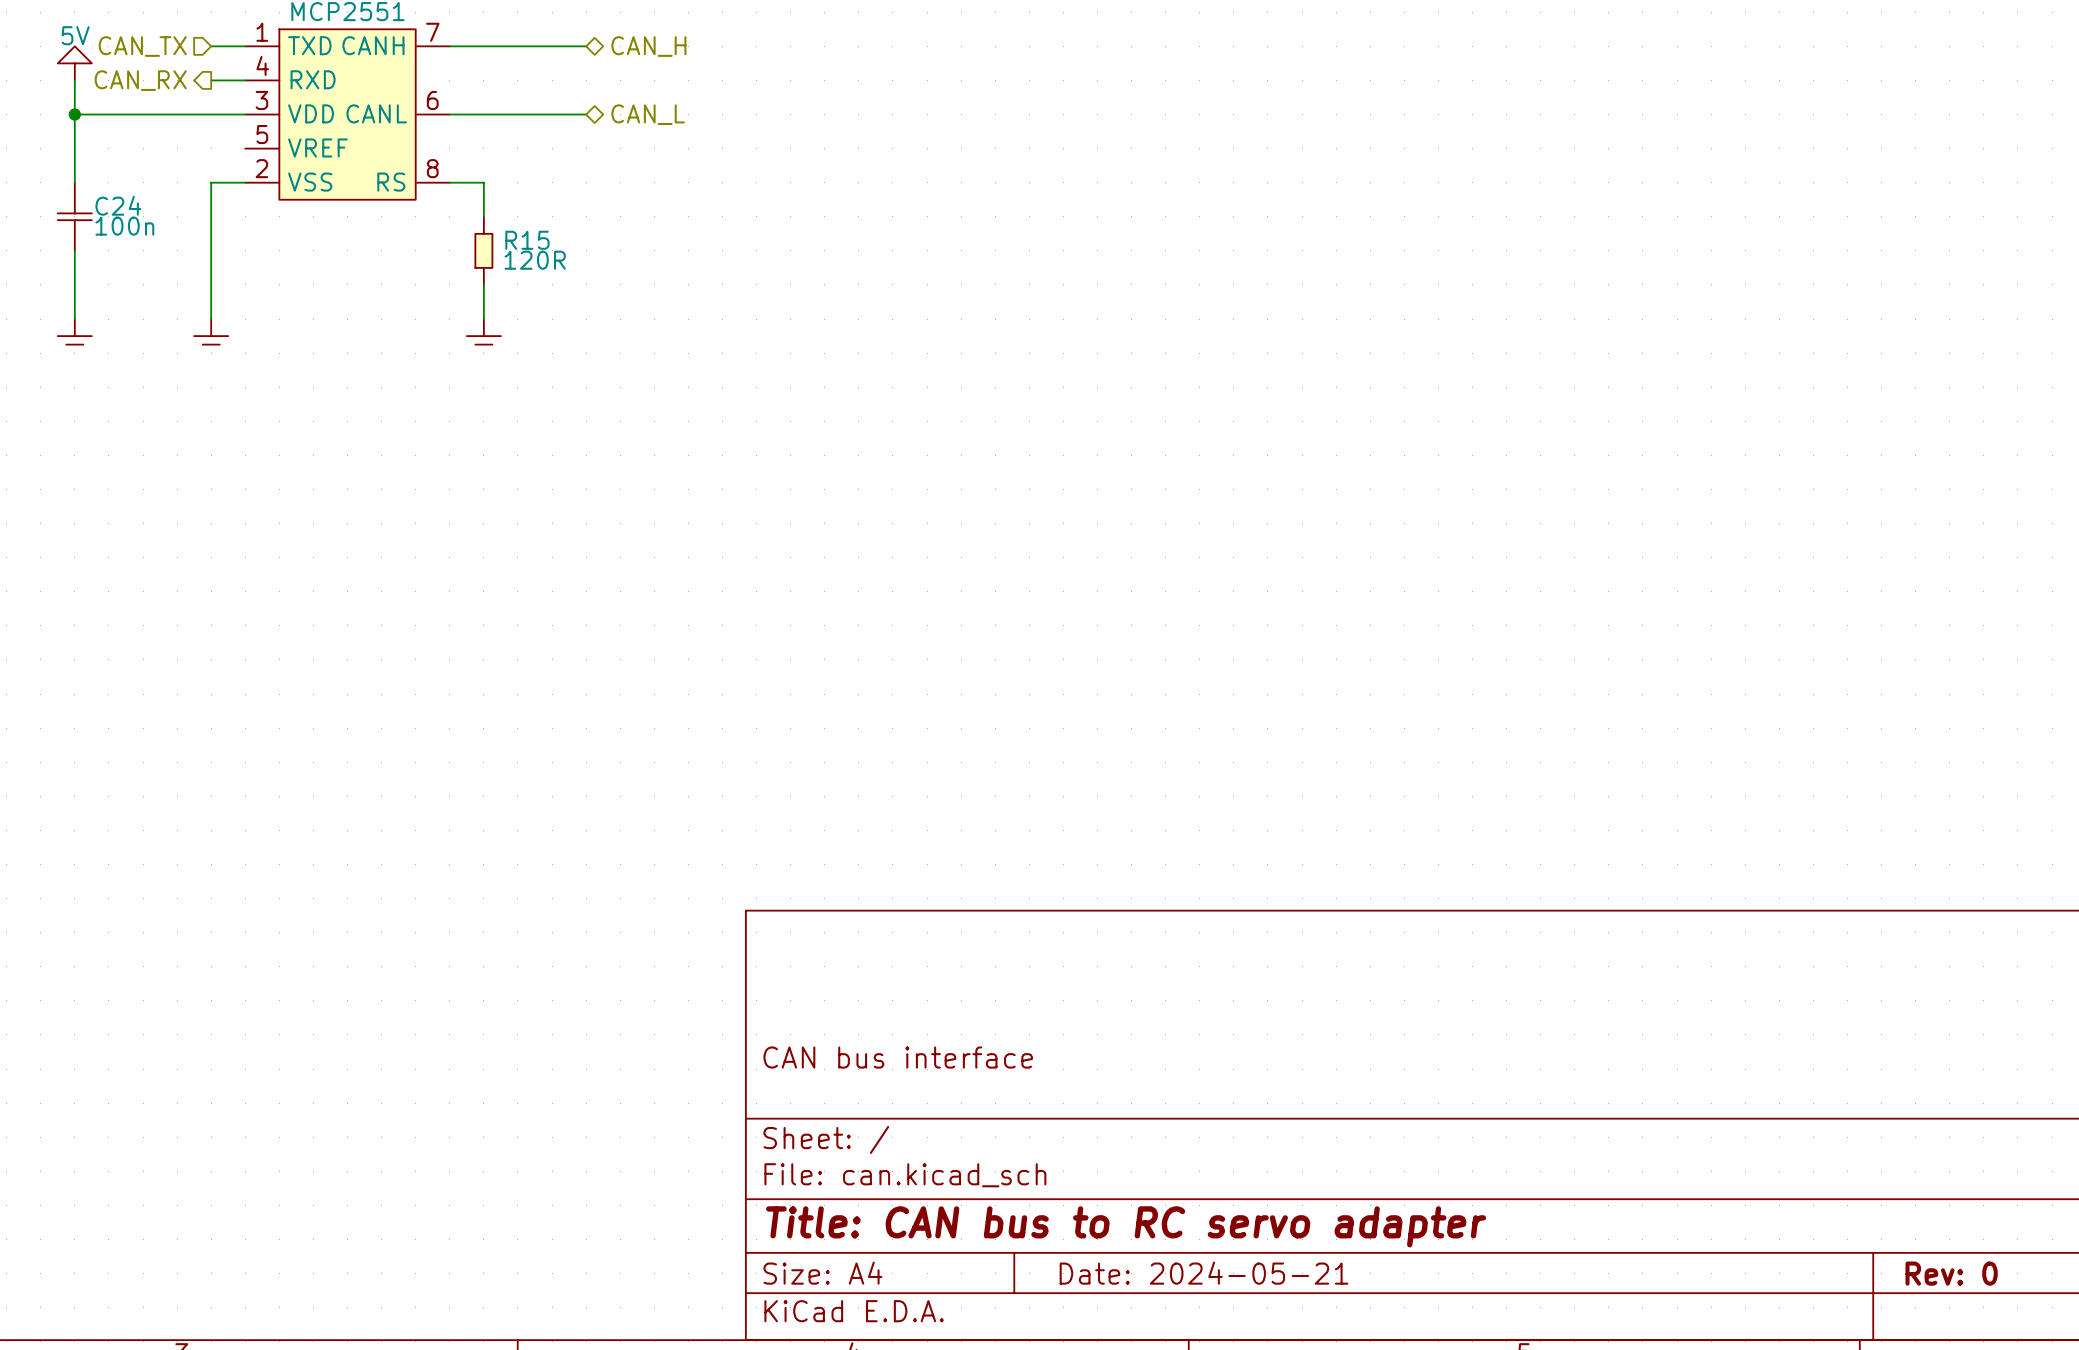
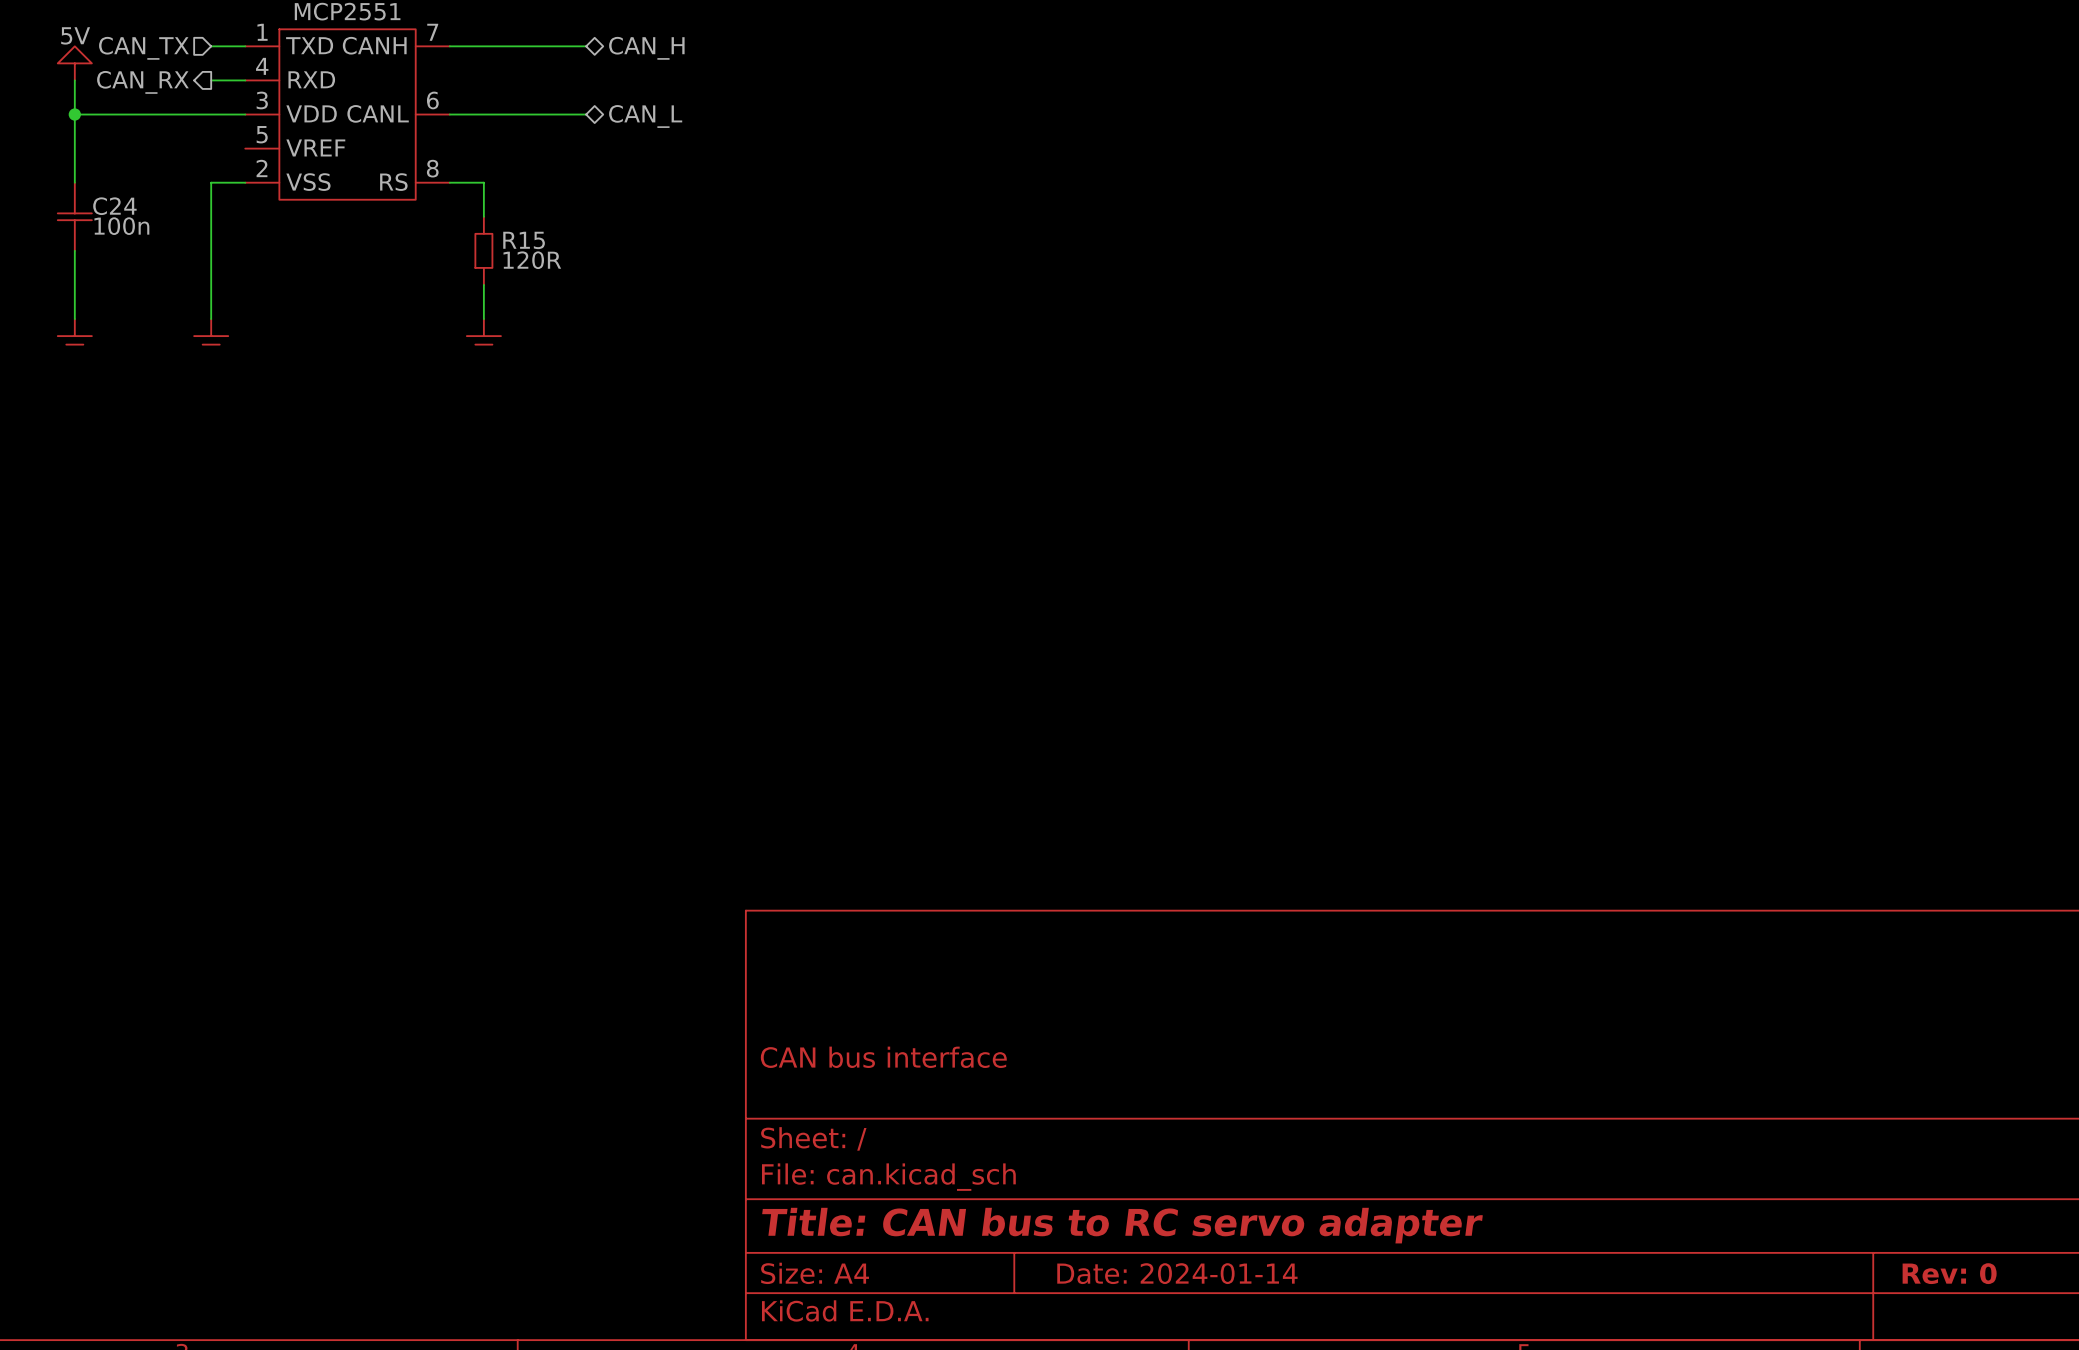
title block: Date: 2024-05-21 (1204, 1273) -> Date: 2024-01-14 (1177, 1273)

